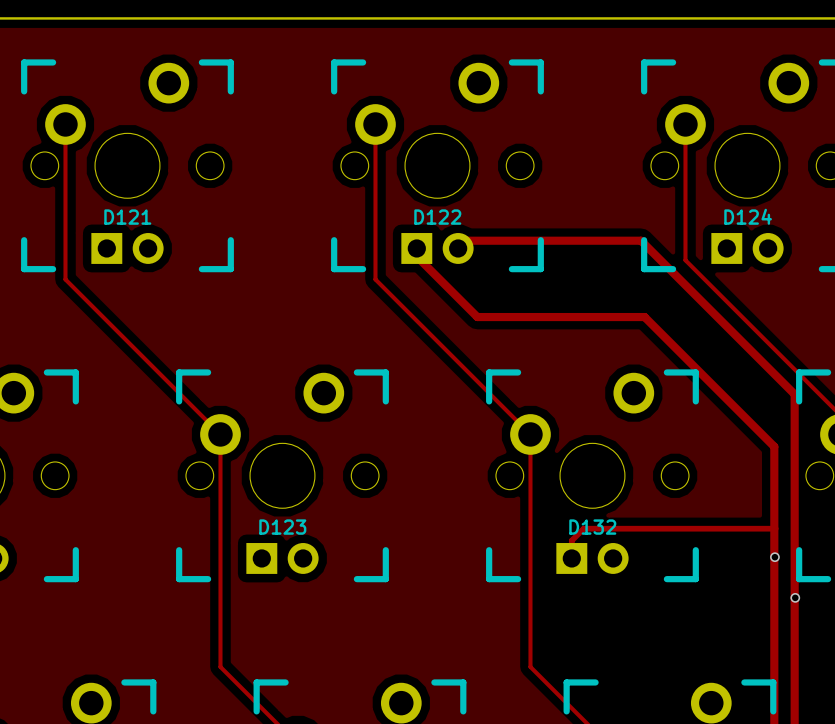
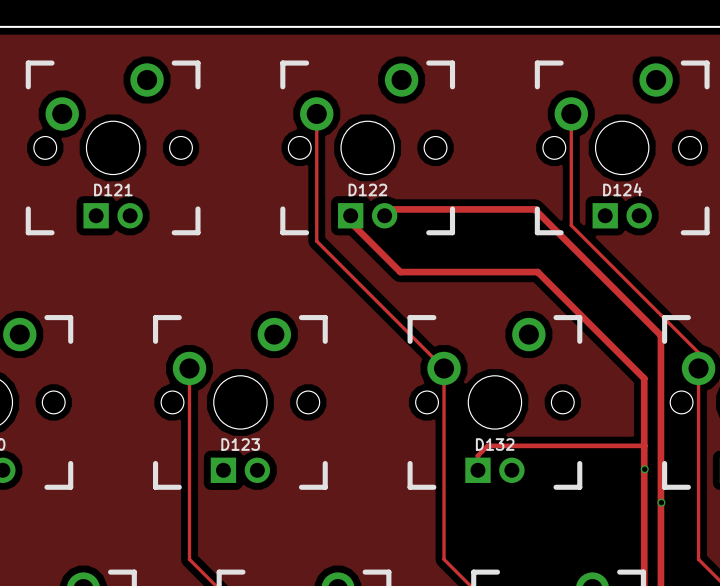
track: (65, 124) (65, 279) (220, 434) -> none

